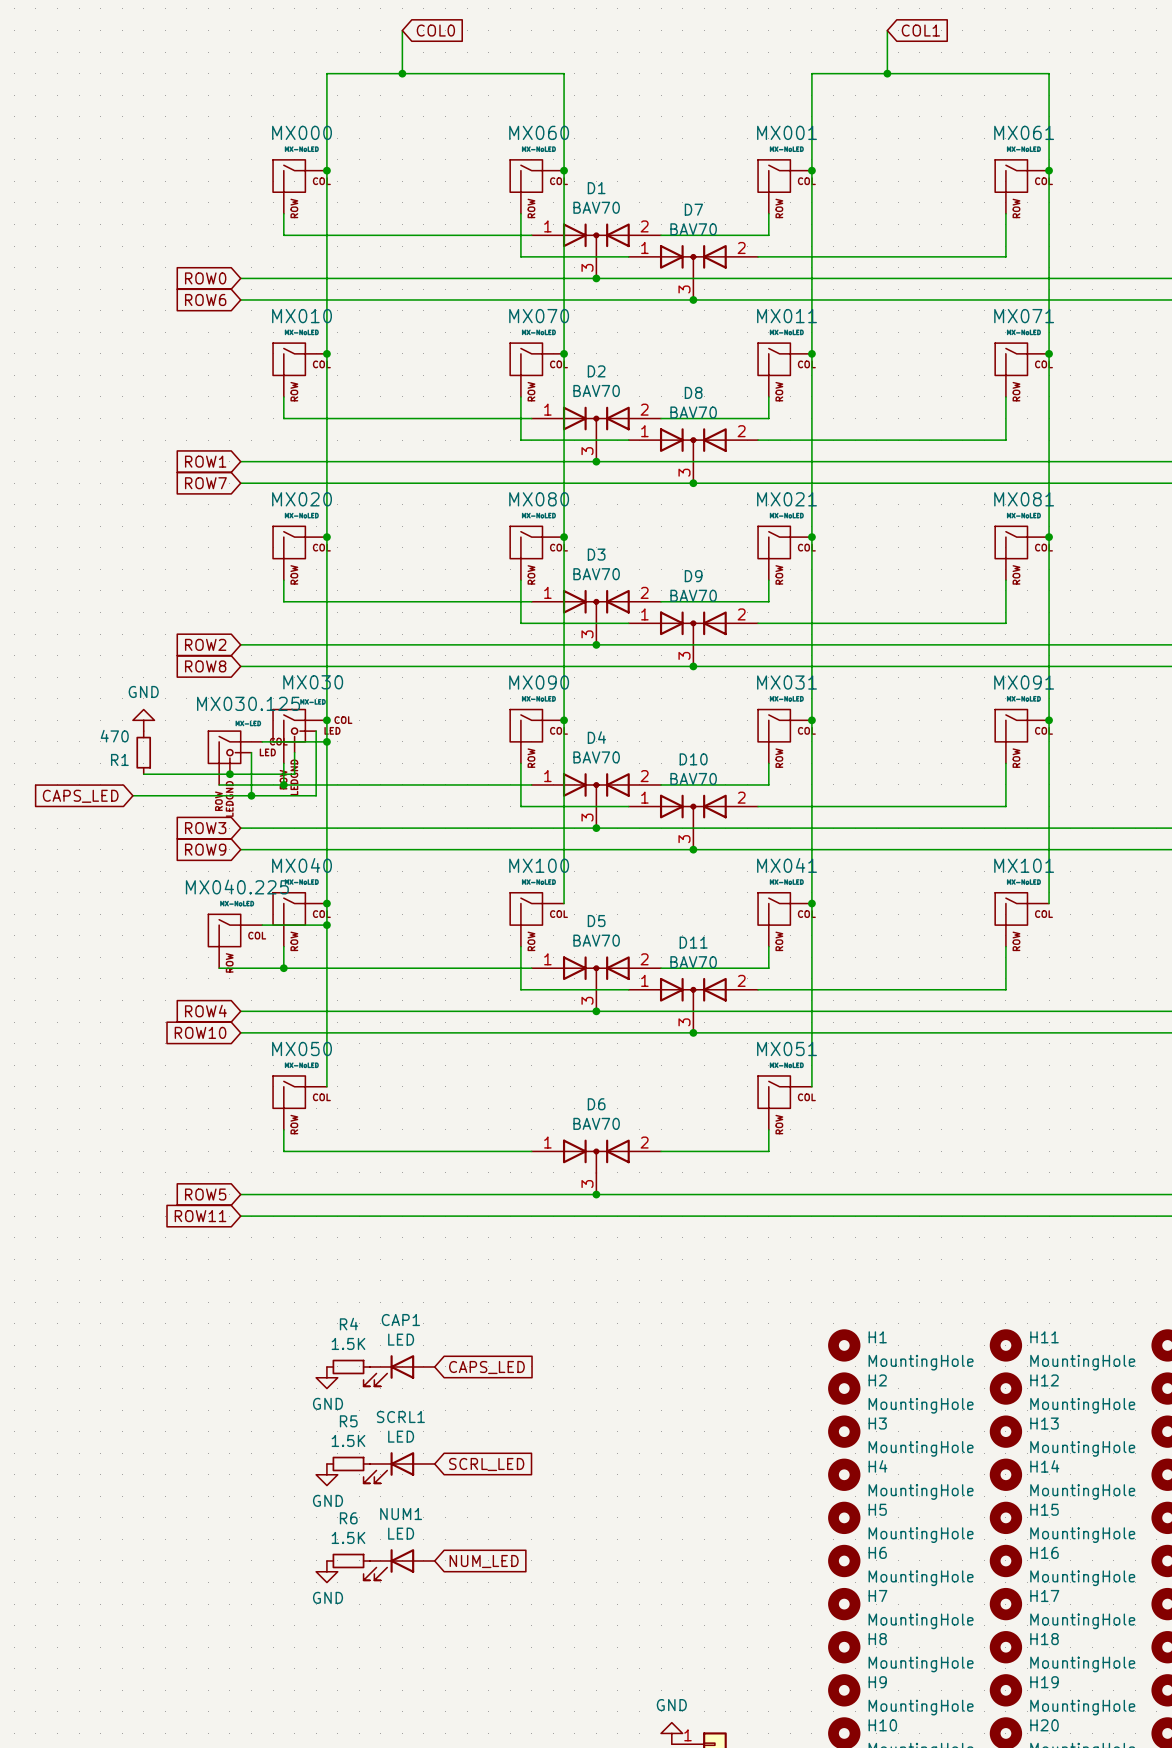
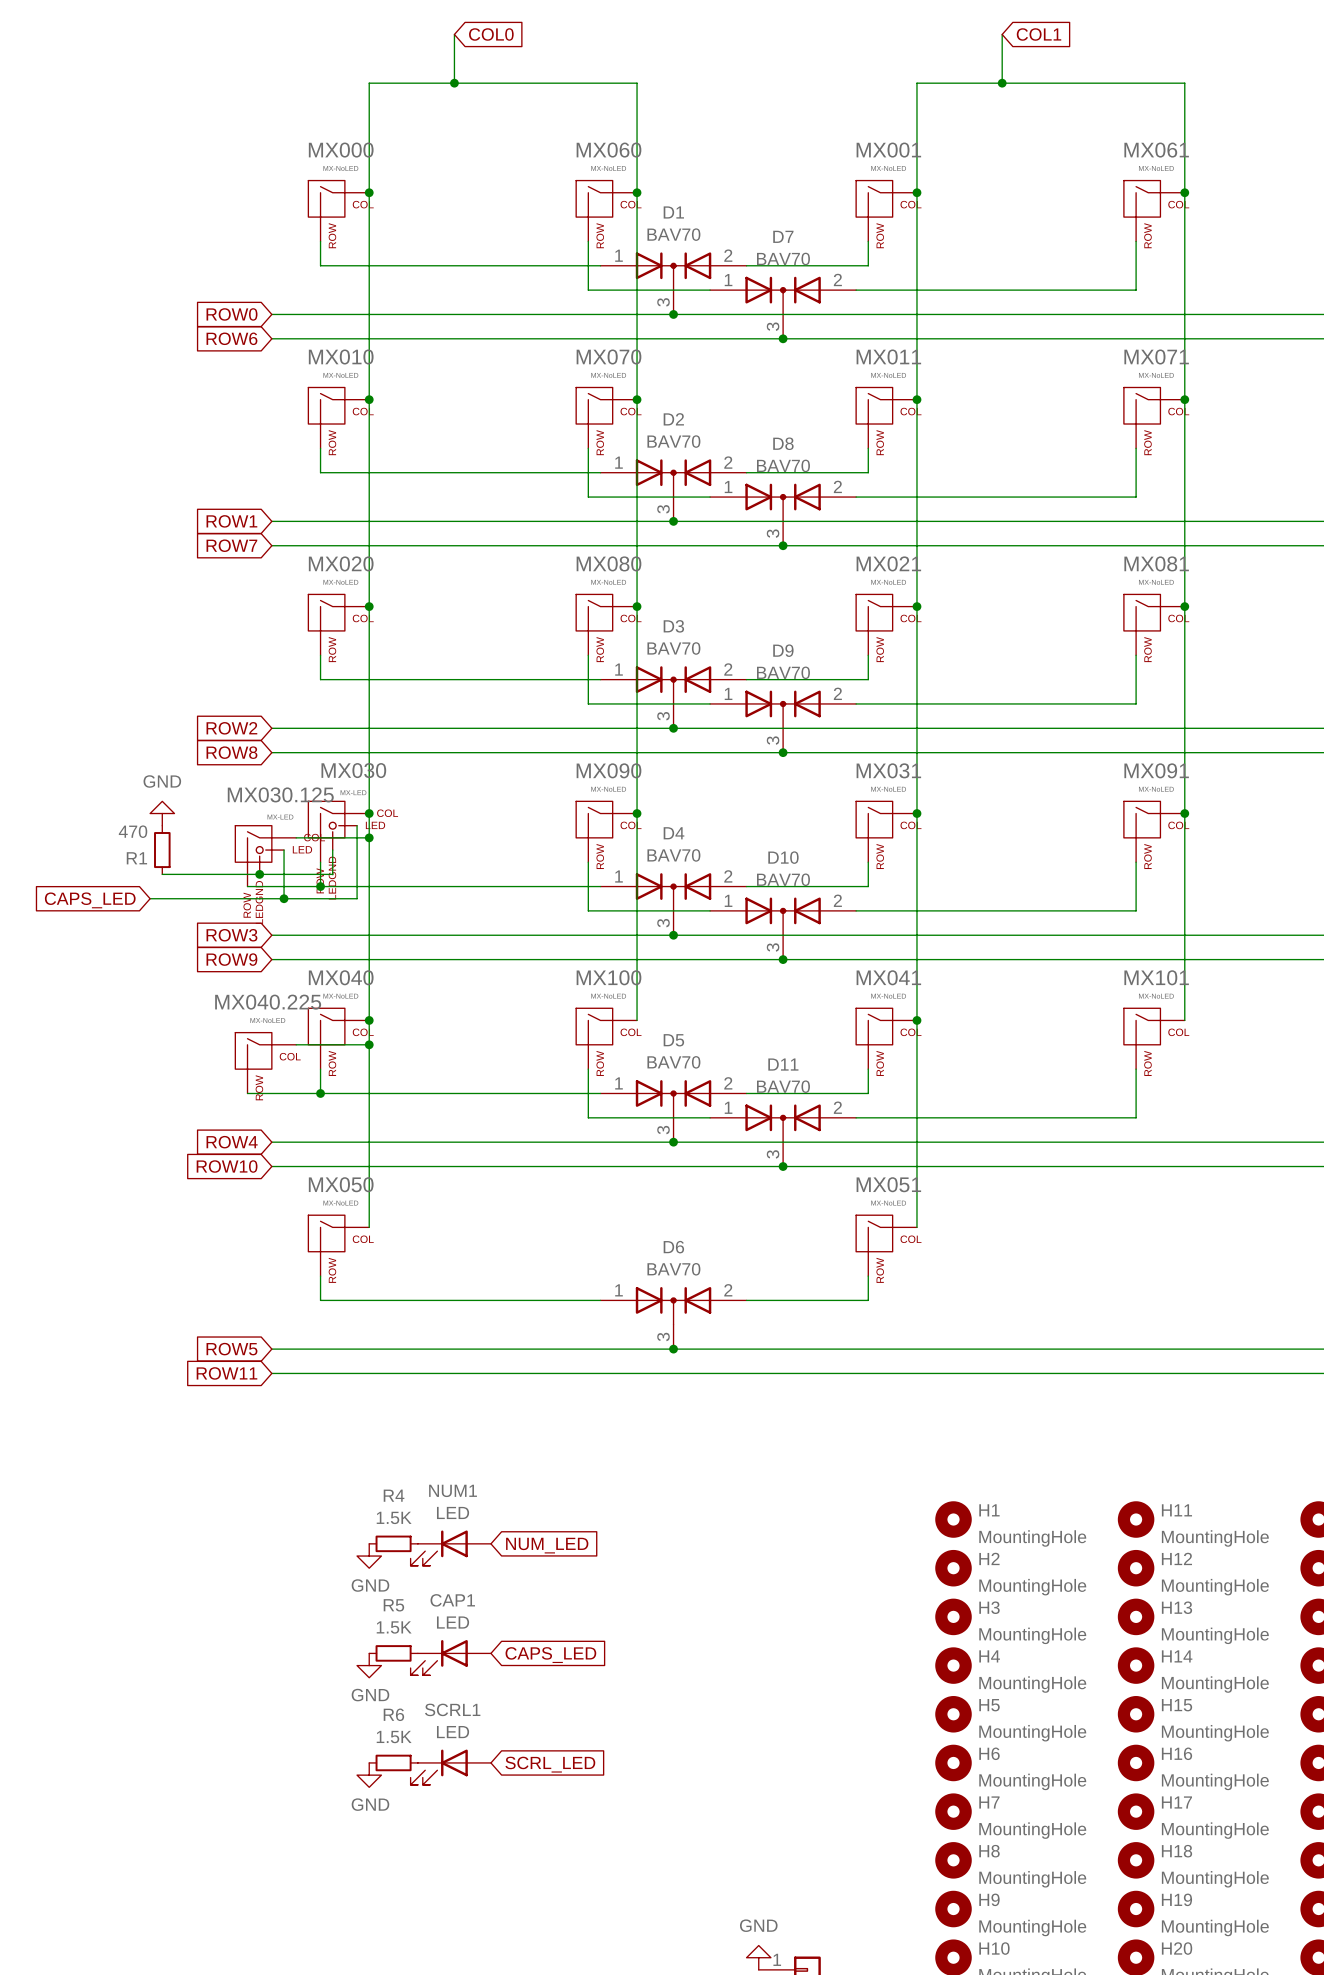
CAP1 name: CAP1 (400, 1320) -> NUM1 (453, 1490)
global label: CAPS_LED (486, 1367) -> NUM_LED (547, 1545)
SCRL1 name: SCRL1 (400, 1417) -> CAP1 (452, 1600)
global label: SCRL_LED (486, 1464) -> CAPS_LED (550, 1655)
NUM1 name: NUM1 (401, 1514) -> SCRL1 (452, 1709)
global label: NUM_LED (484, 1561) -> SCRL_LED (550, 1764)

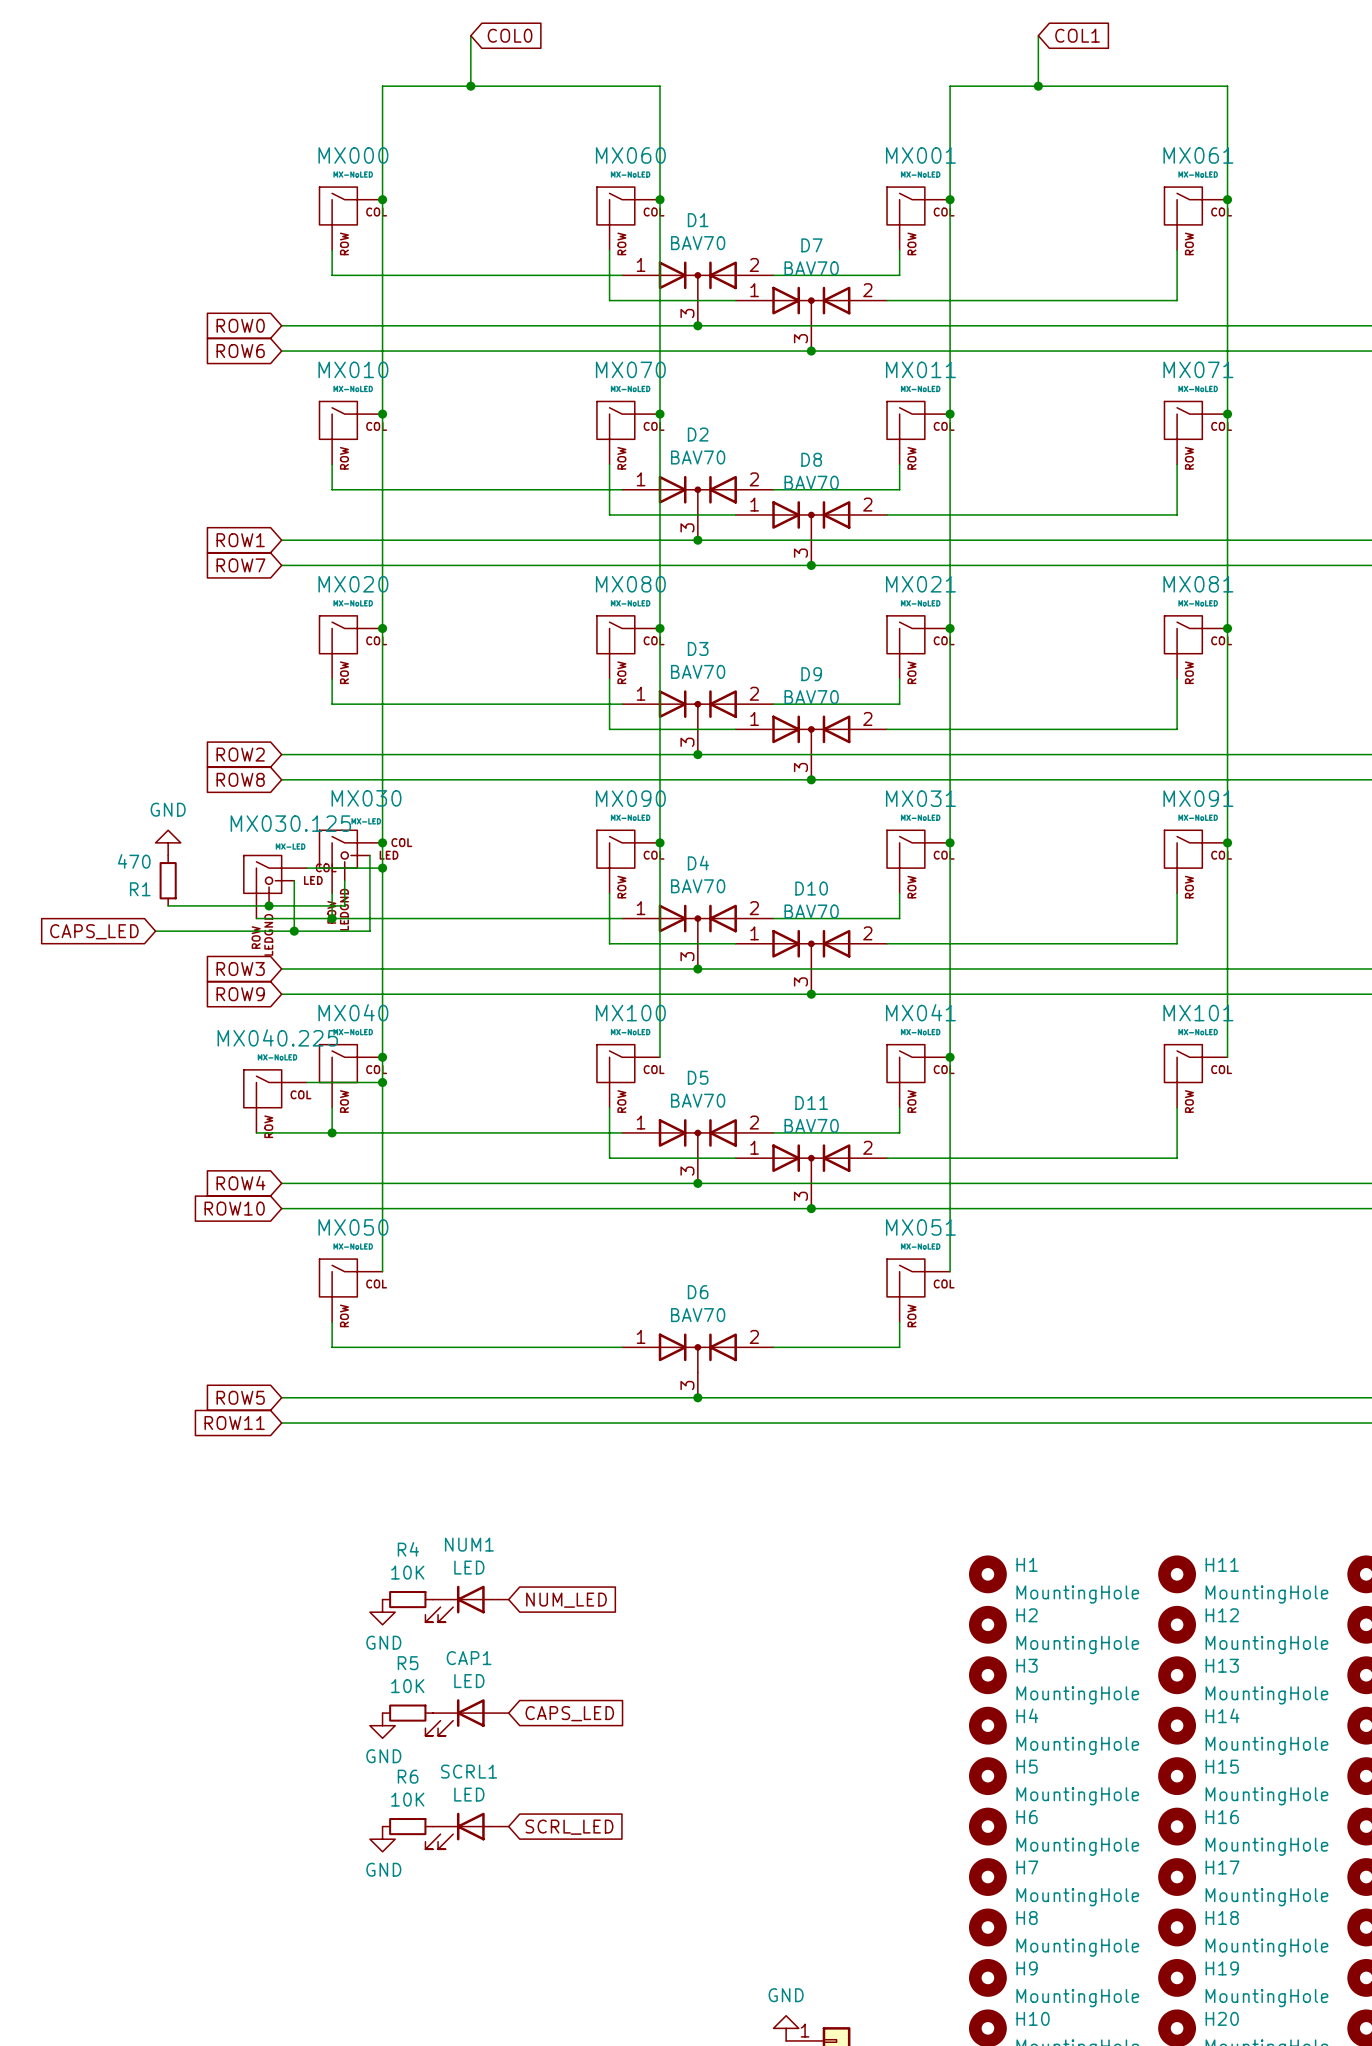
R4 value: 1.5K (394, 1517) -> 10K (407, 1572)
R5 value: 1.5K (394, 1627) -> 10K (407, 1686)
R6 value: 1.5K (394, 1737) -> 10K (407, 1799)

